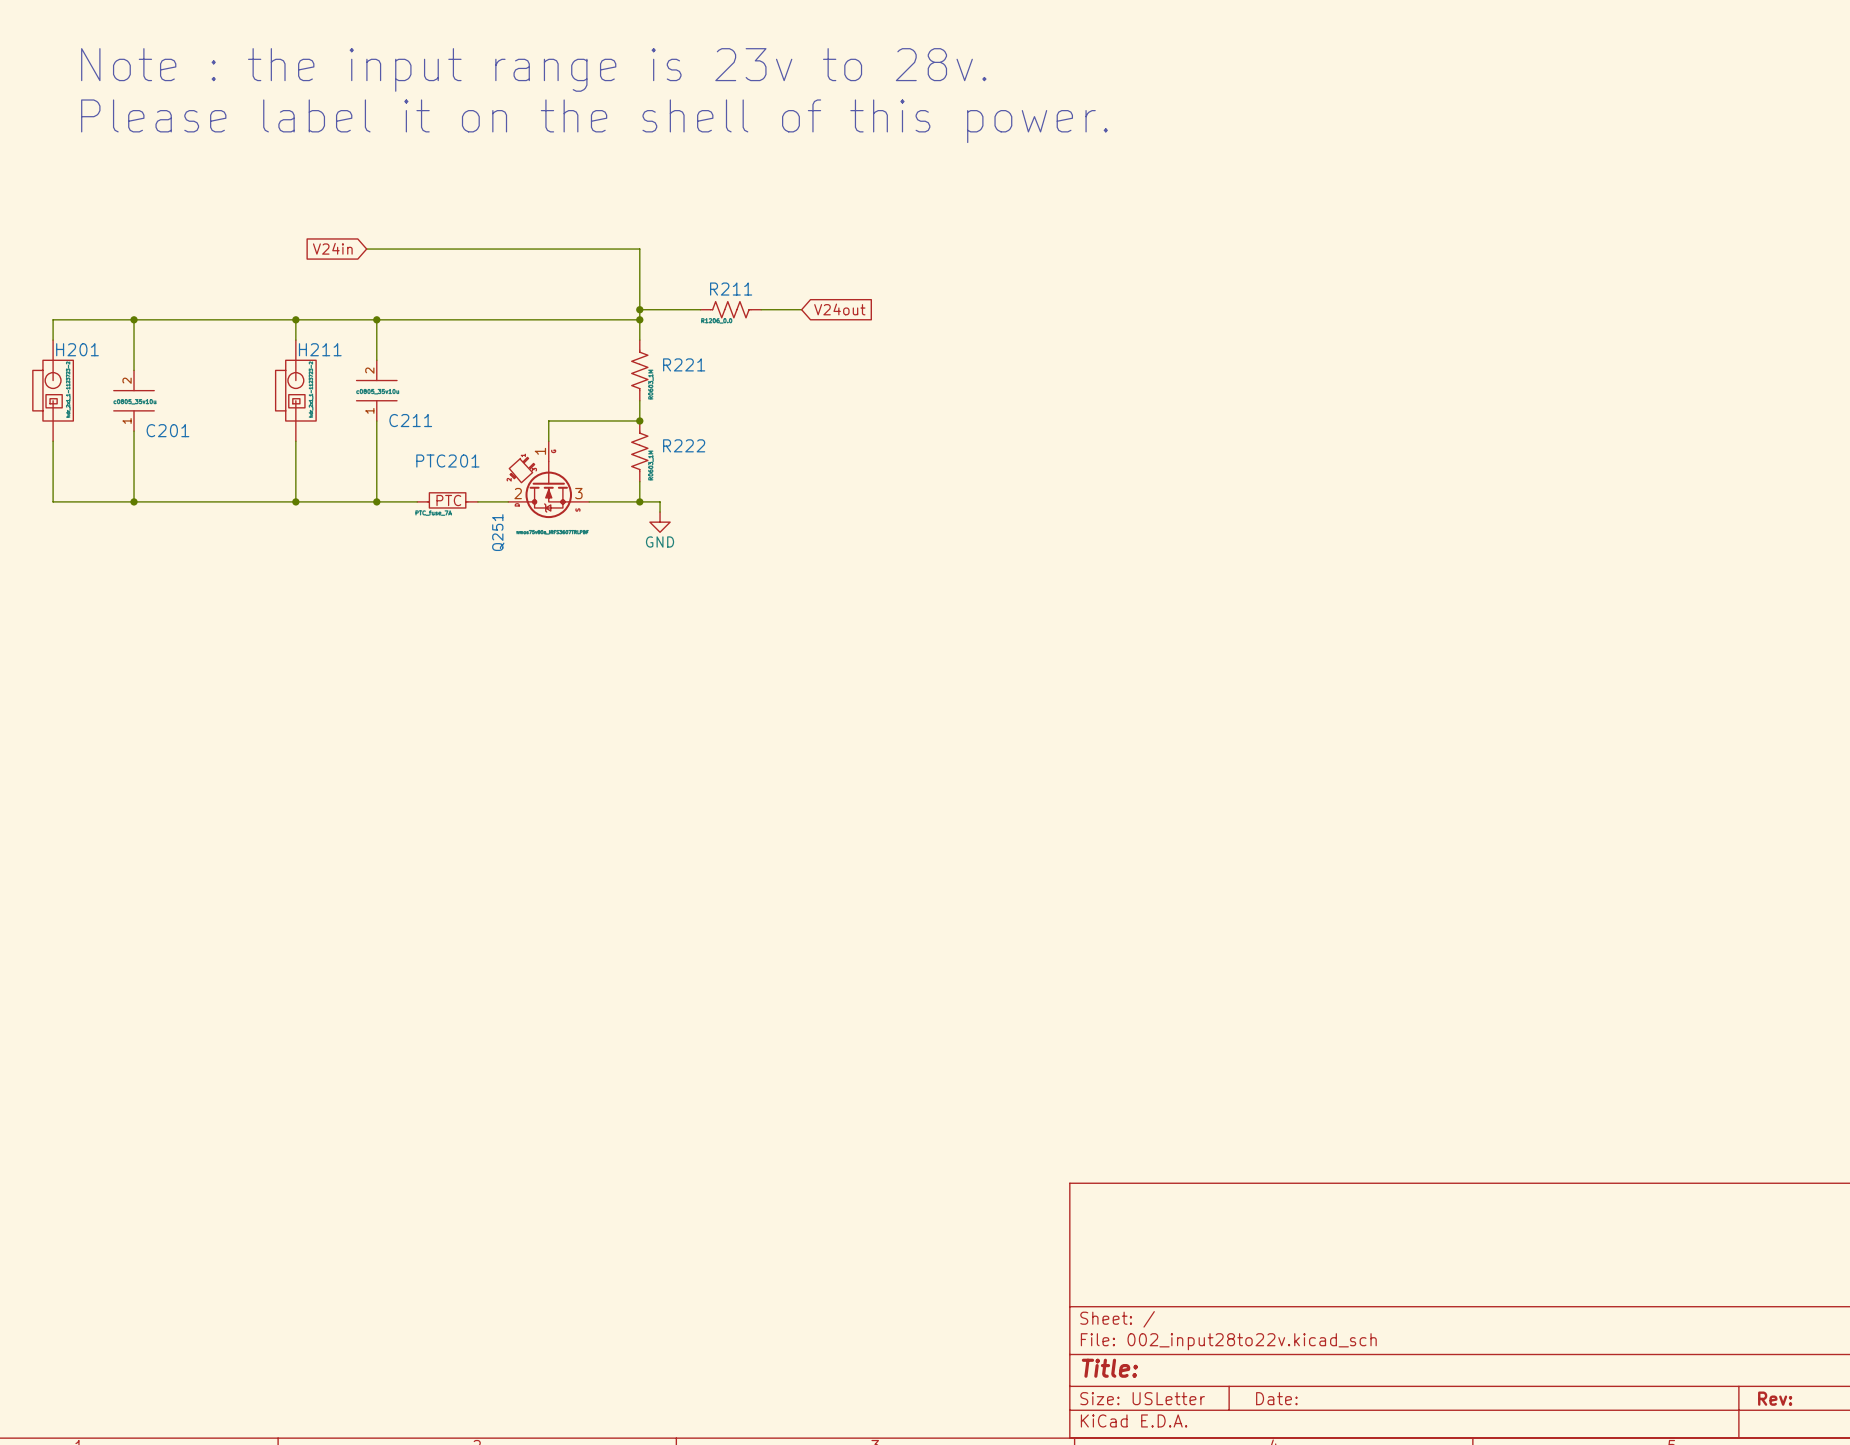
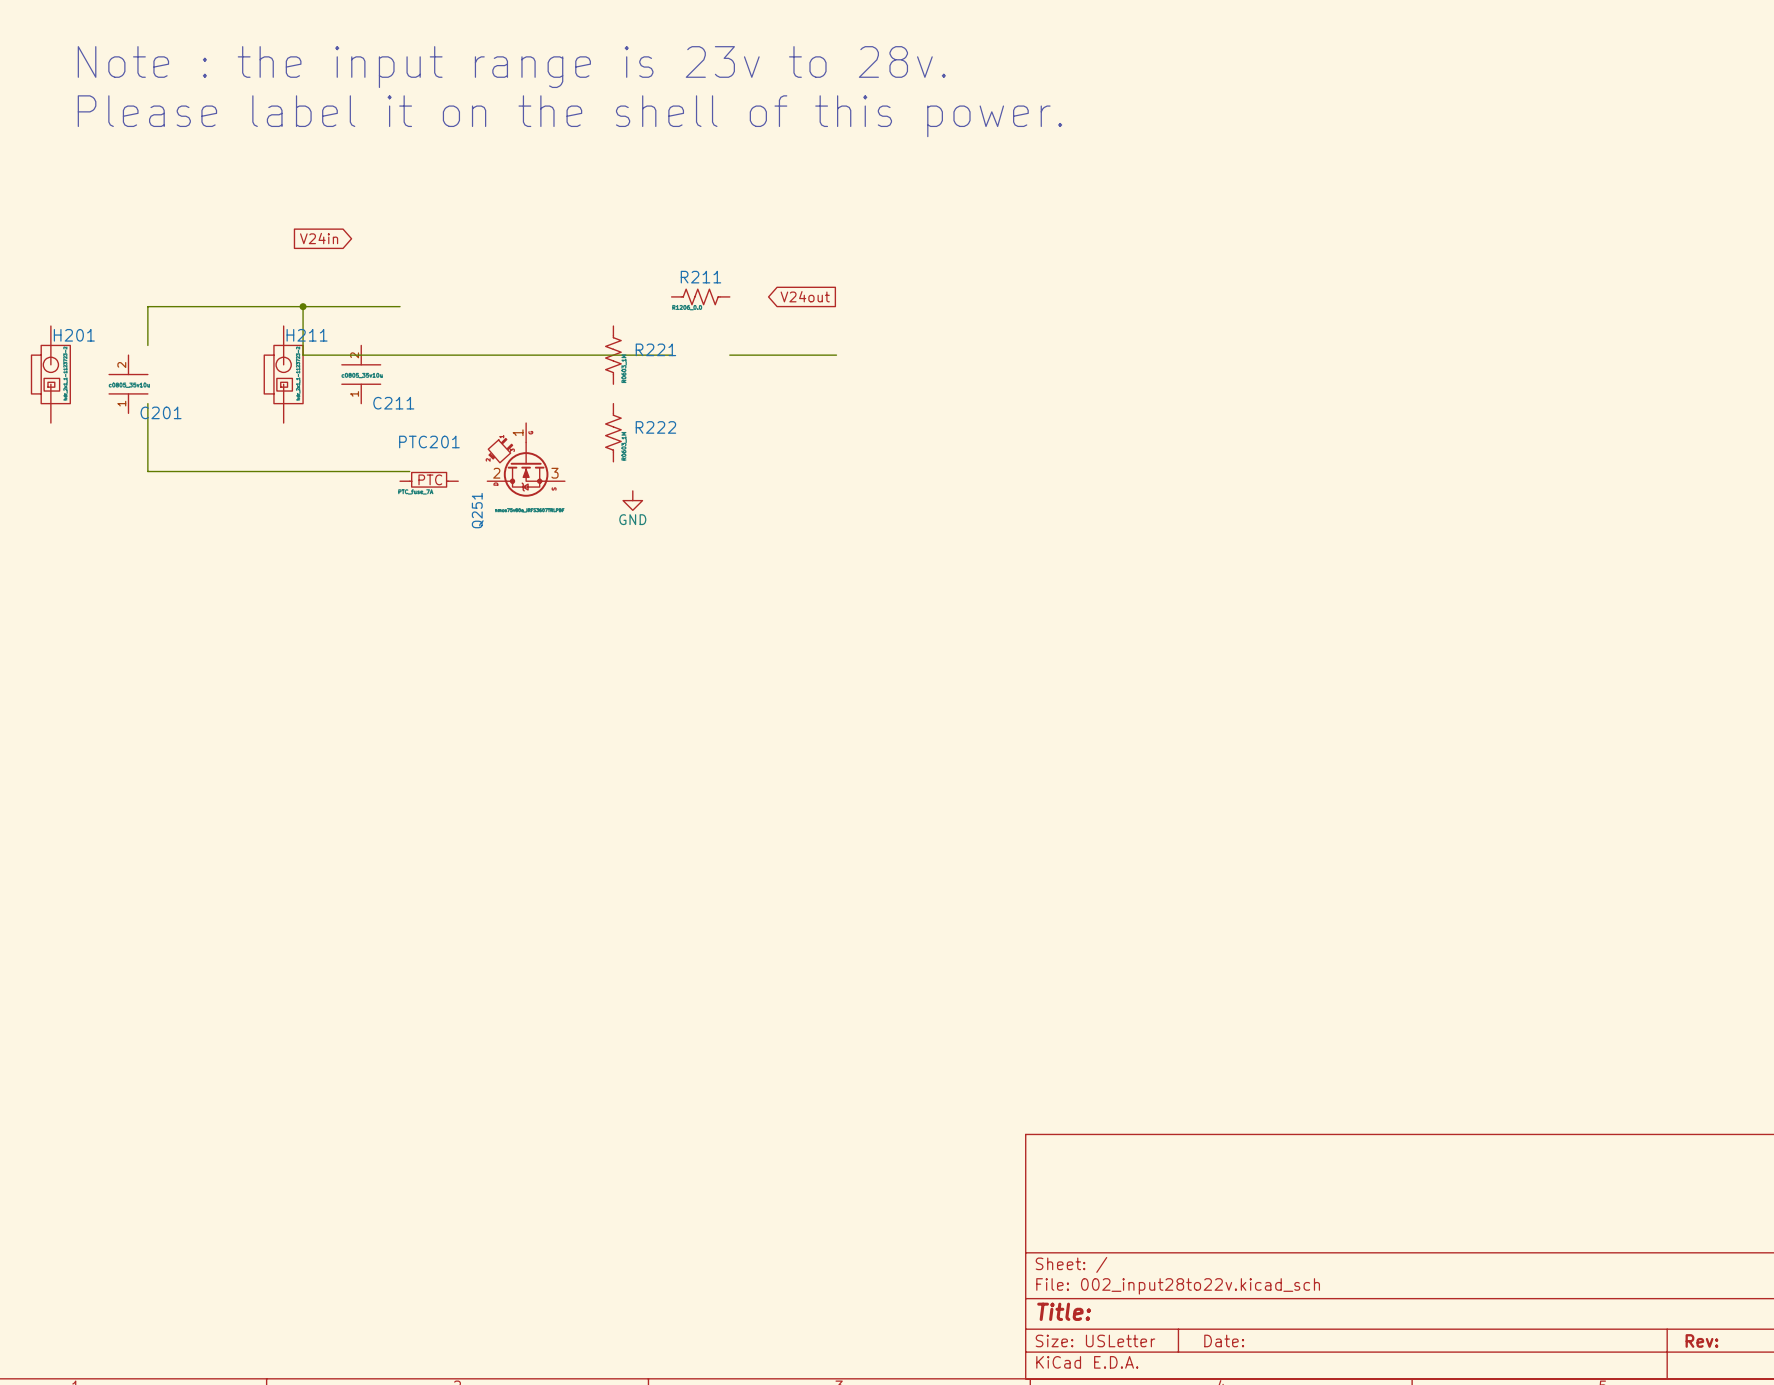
wire: (366, 249) (639, 249) (639, 340) -> none
wire: (639, 309) (700, 309) -> none
junction: (639, 309) -> none
wire: (761, 309) (801, 309) -> none
wire: (134, 319) (134, 370) -> none
junction: (134, 319) -> none
wire: (154, 319) (53, 319) (53, 340) -> (147, 306) (147, 345)
wire: (295, 319) (295, 340) -> none
junction position: (295, 319) -> (303, 306)
wire: none -> (303, 306) (303, 355) (671, 355)
wire: (376, 319) (376, 360) -> none
junction: (376, 319) -> none
wire: (417, 319) (639, 319) -> none
junction: (639, 319) -> none
wire: none -> (729, 355) (836, 355)
wire: (639, 400) (639, 420) (548, 420) (548, 441) -> none
wire: none -> (147, 403) (147, 471) (409, 471)
wire: (376, 420) (376, 501) -> none
junction: (639, 420) -> none
wire: (134, 431) (134, 501) -> none
wire: (53, 441) (53, 501) (417, 501) -> none
wire: (295, 441) (295, 501) -> none
wire: (639, 481) (639, 501) -> none
junction: (134, 501) -> none
junction: (295, 501) -> none
junction: (376, 501) -> none
wire: (477, 501) (508, 501) -> none
wire: (589, 501) (660, 501) (660, 512) -> none
junction: (639, 501) -> none

